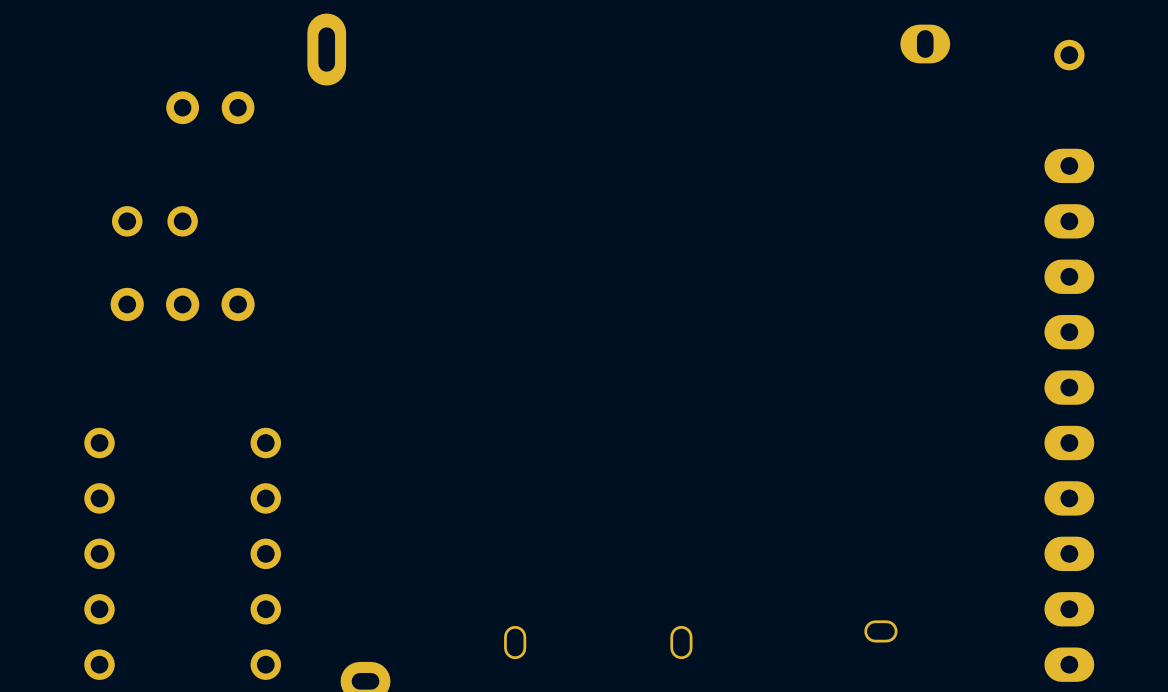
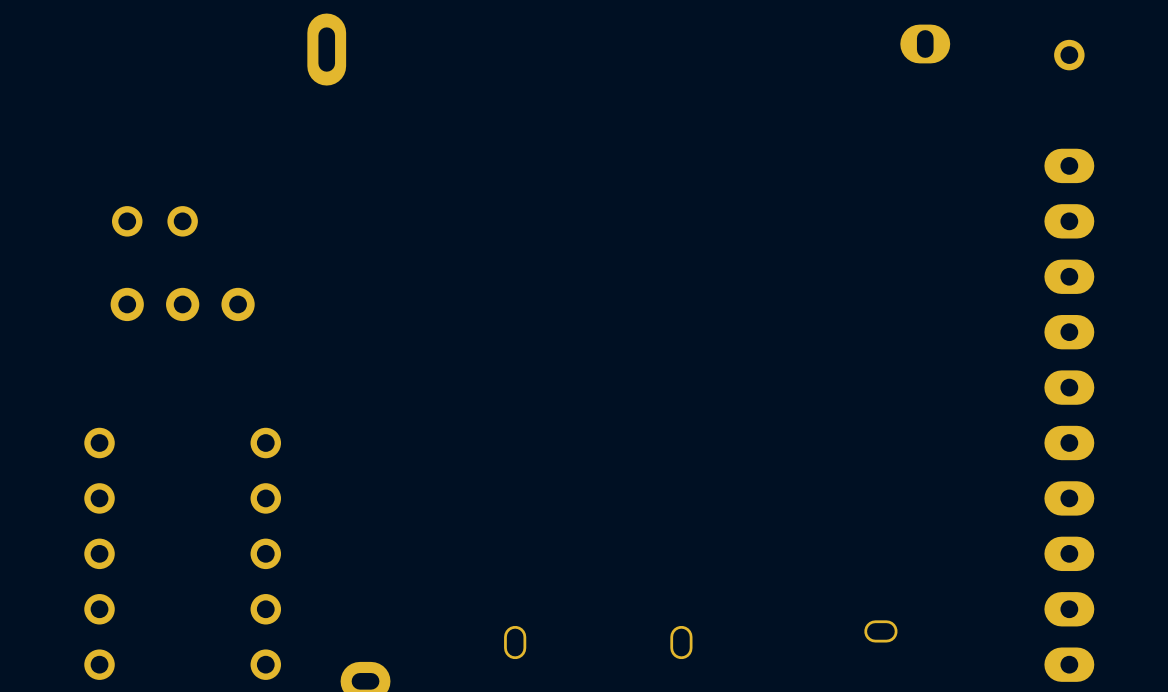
part: (210, 107) -> none

